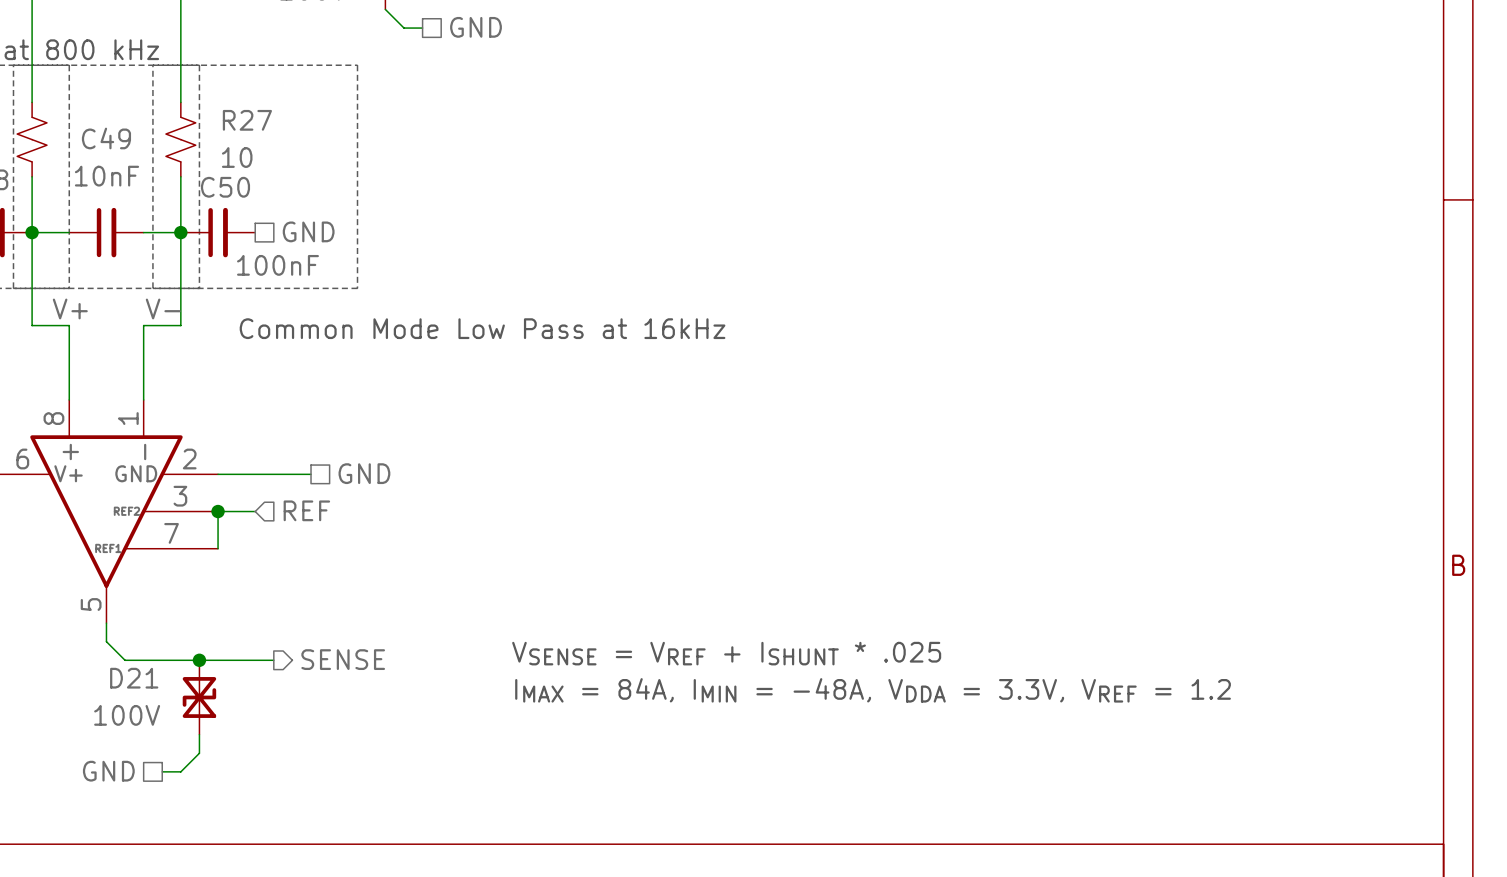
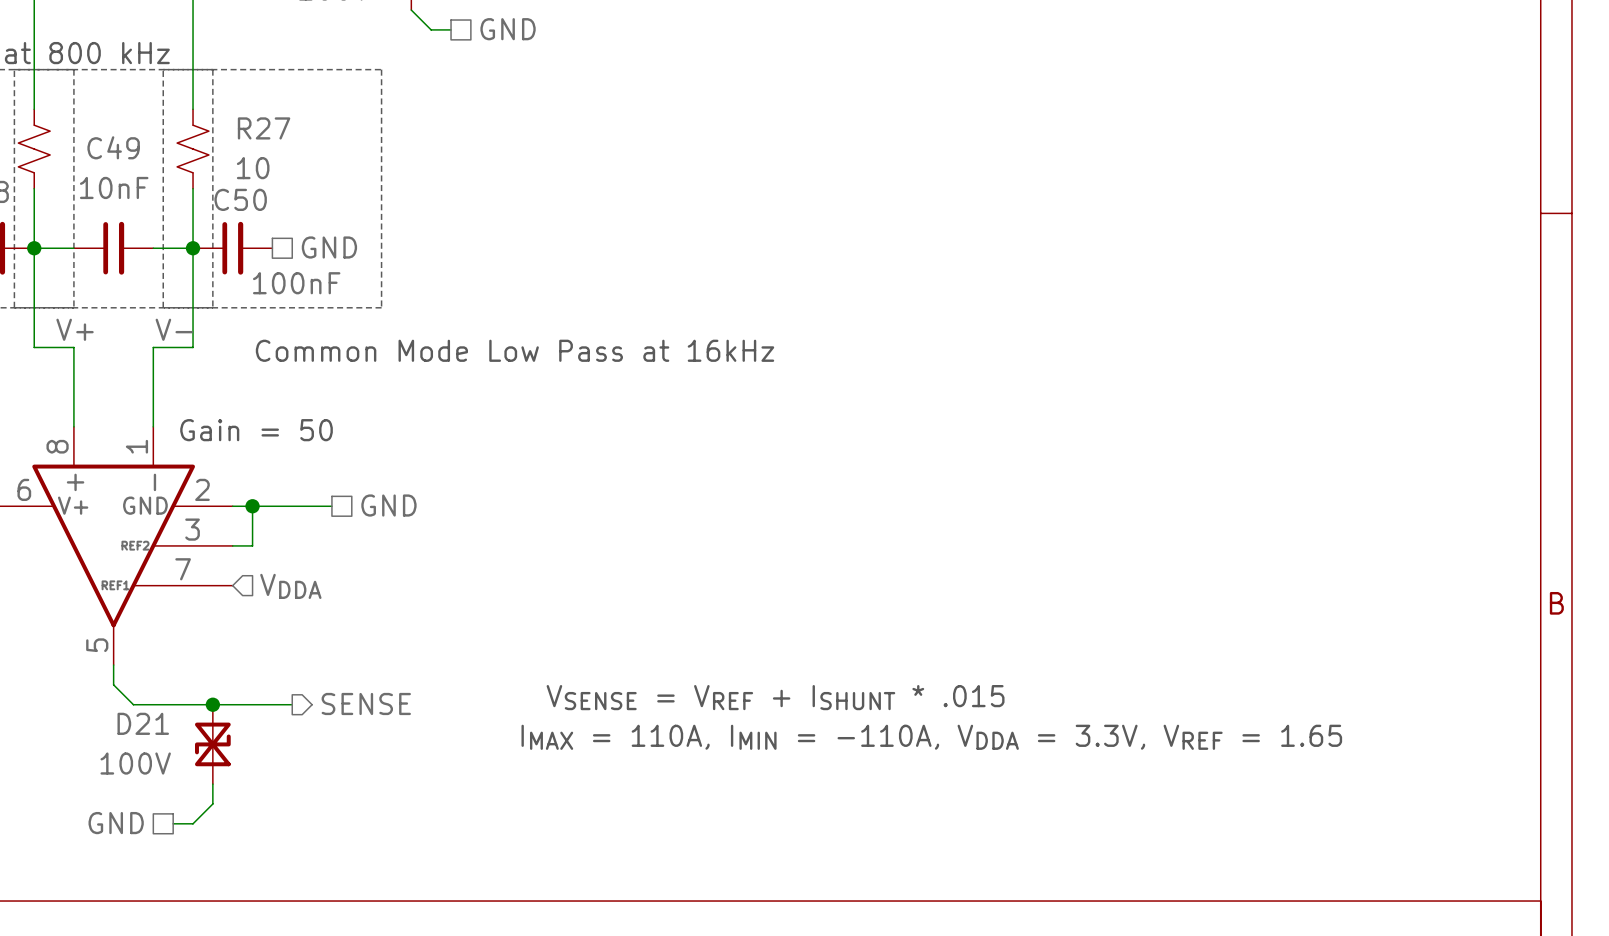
text: none -> Gain = 50 (256, 430)
hierarchical label: REF (306, 510) -> none
wire: (218, 511) (218, 548) -> none
junction position: (218, 511) -> (252, 506)
wire: (236, 511) (255, 511) -> (252, 545) (252, 506)
hierarchical label: none -> VDDA (290, 586)
text: VSENSE = VREF + ISHUNT * .025 (726, 653) -> VSENSE = VREF + ISHUNT * .015 (775, 697)
text: IMAX = 84A, IMIN = -48A, VDDA = 3.3V, VREF = 1.2 (873, 690) -> IMAX = 110A, IMIN = -110A, VDDA = 3.3V, VREF = 1.65 (931, 737)

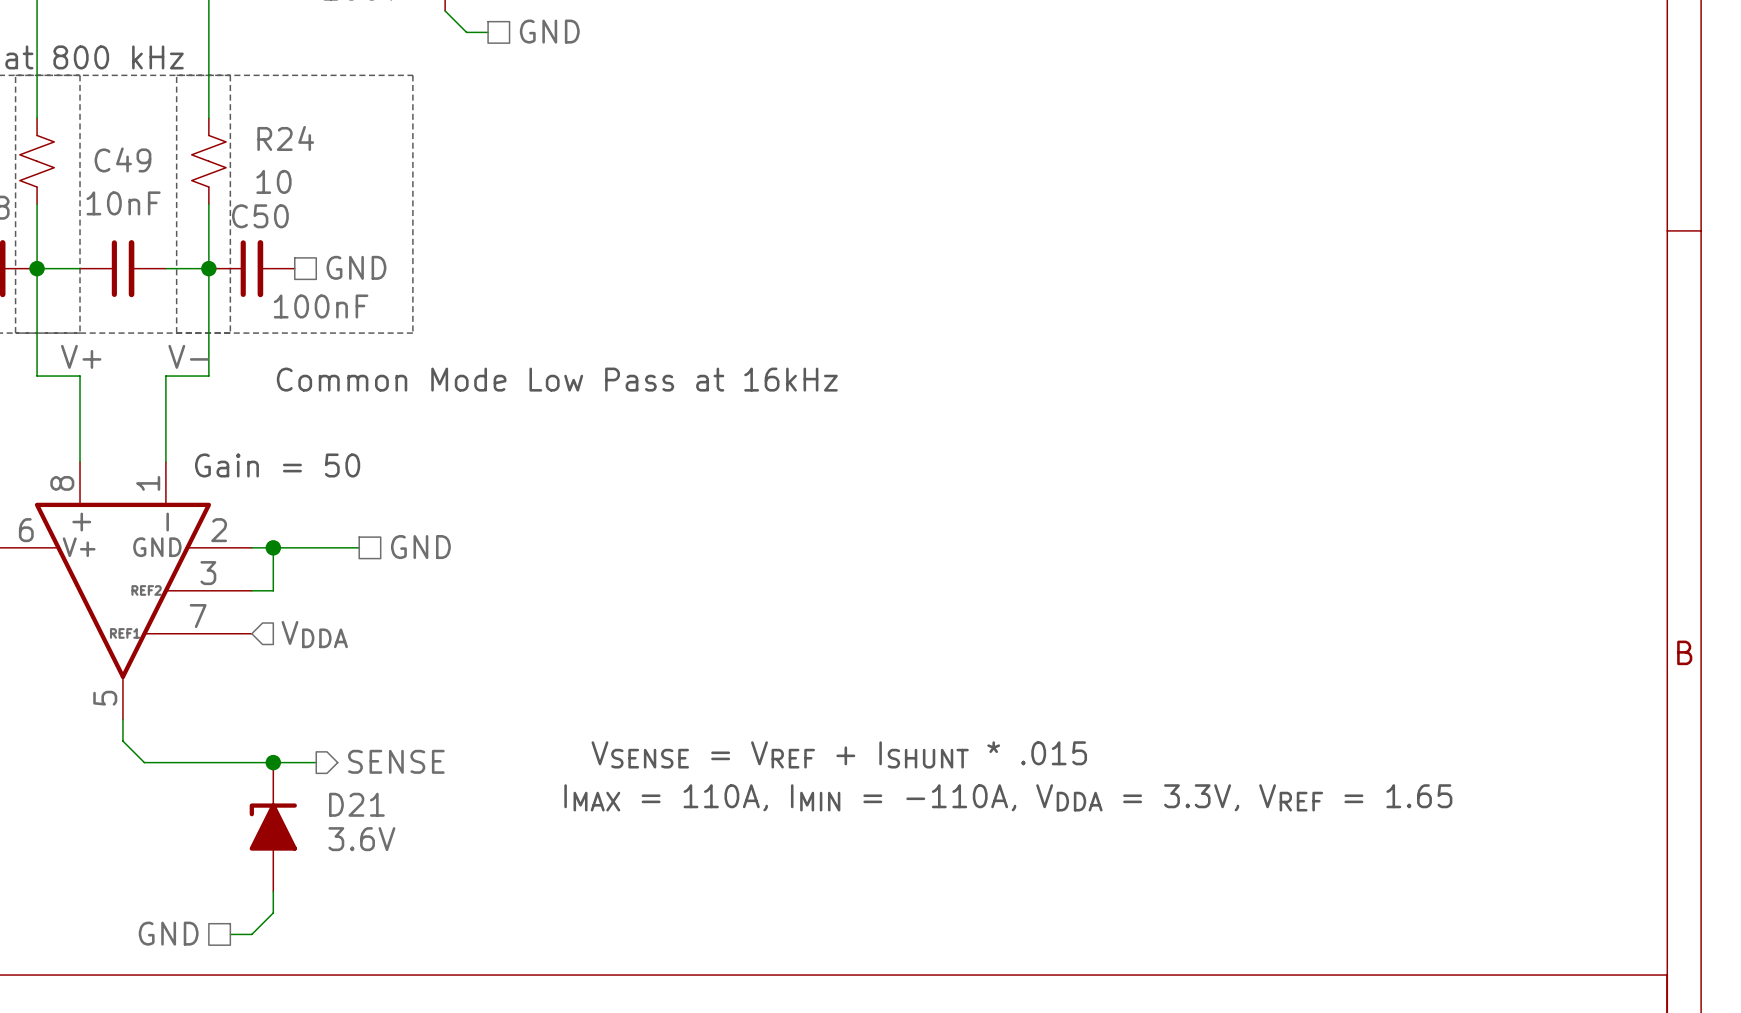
R27 name: R27 (264, 128) -> R24 (285, 138)
D21 symbol: [195, 704, 231, 785] -> [249, 762, 297, 892]
junction position: (212, 704) -> (273, 762)
D21 name position: D21 (143, 723) -> D21 (356, 804)
D21 value: 100V (135, 763) -> 3.6V (361, 839)
wire: (212, 784) (212, 803) (193, 823) (173, 823) -> (273, 891) (273, 912) (251, 934) (230, 934)
hierarchical label position: GND (116, 823) -> GND (168, 933)

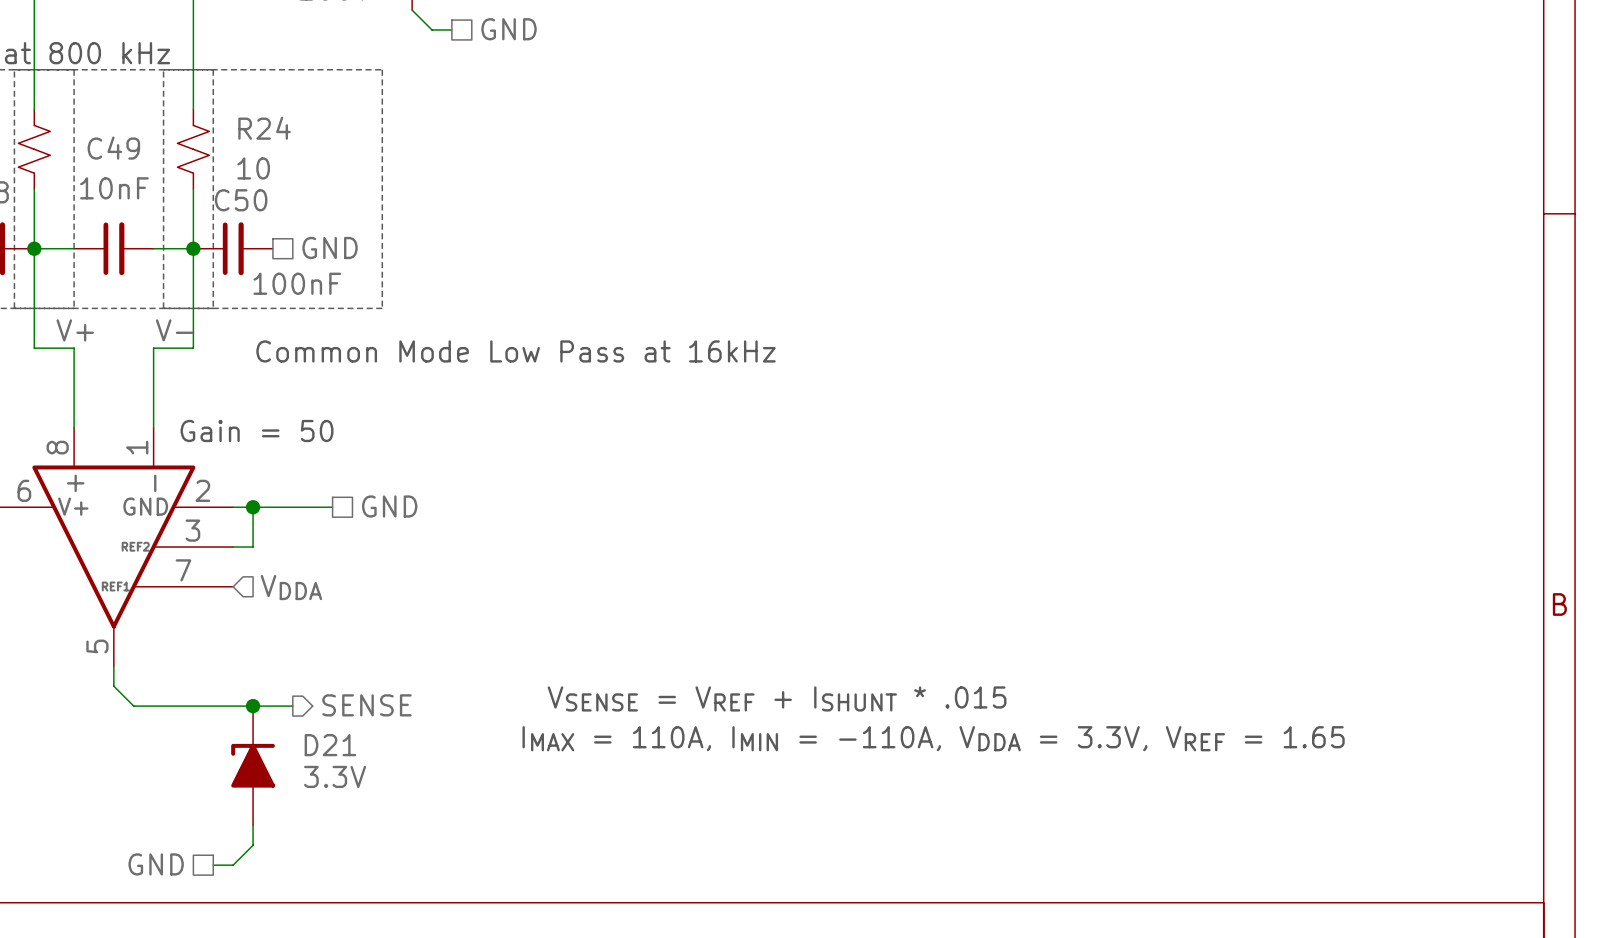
D21 value: 3.6V (361, 839) -> 3.3V (335, 776)

